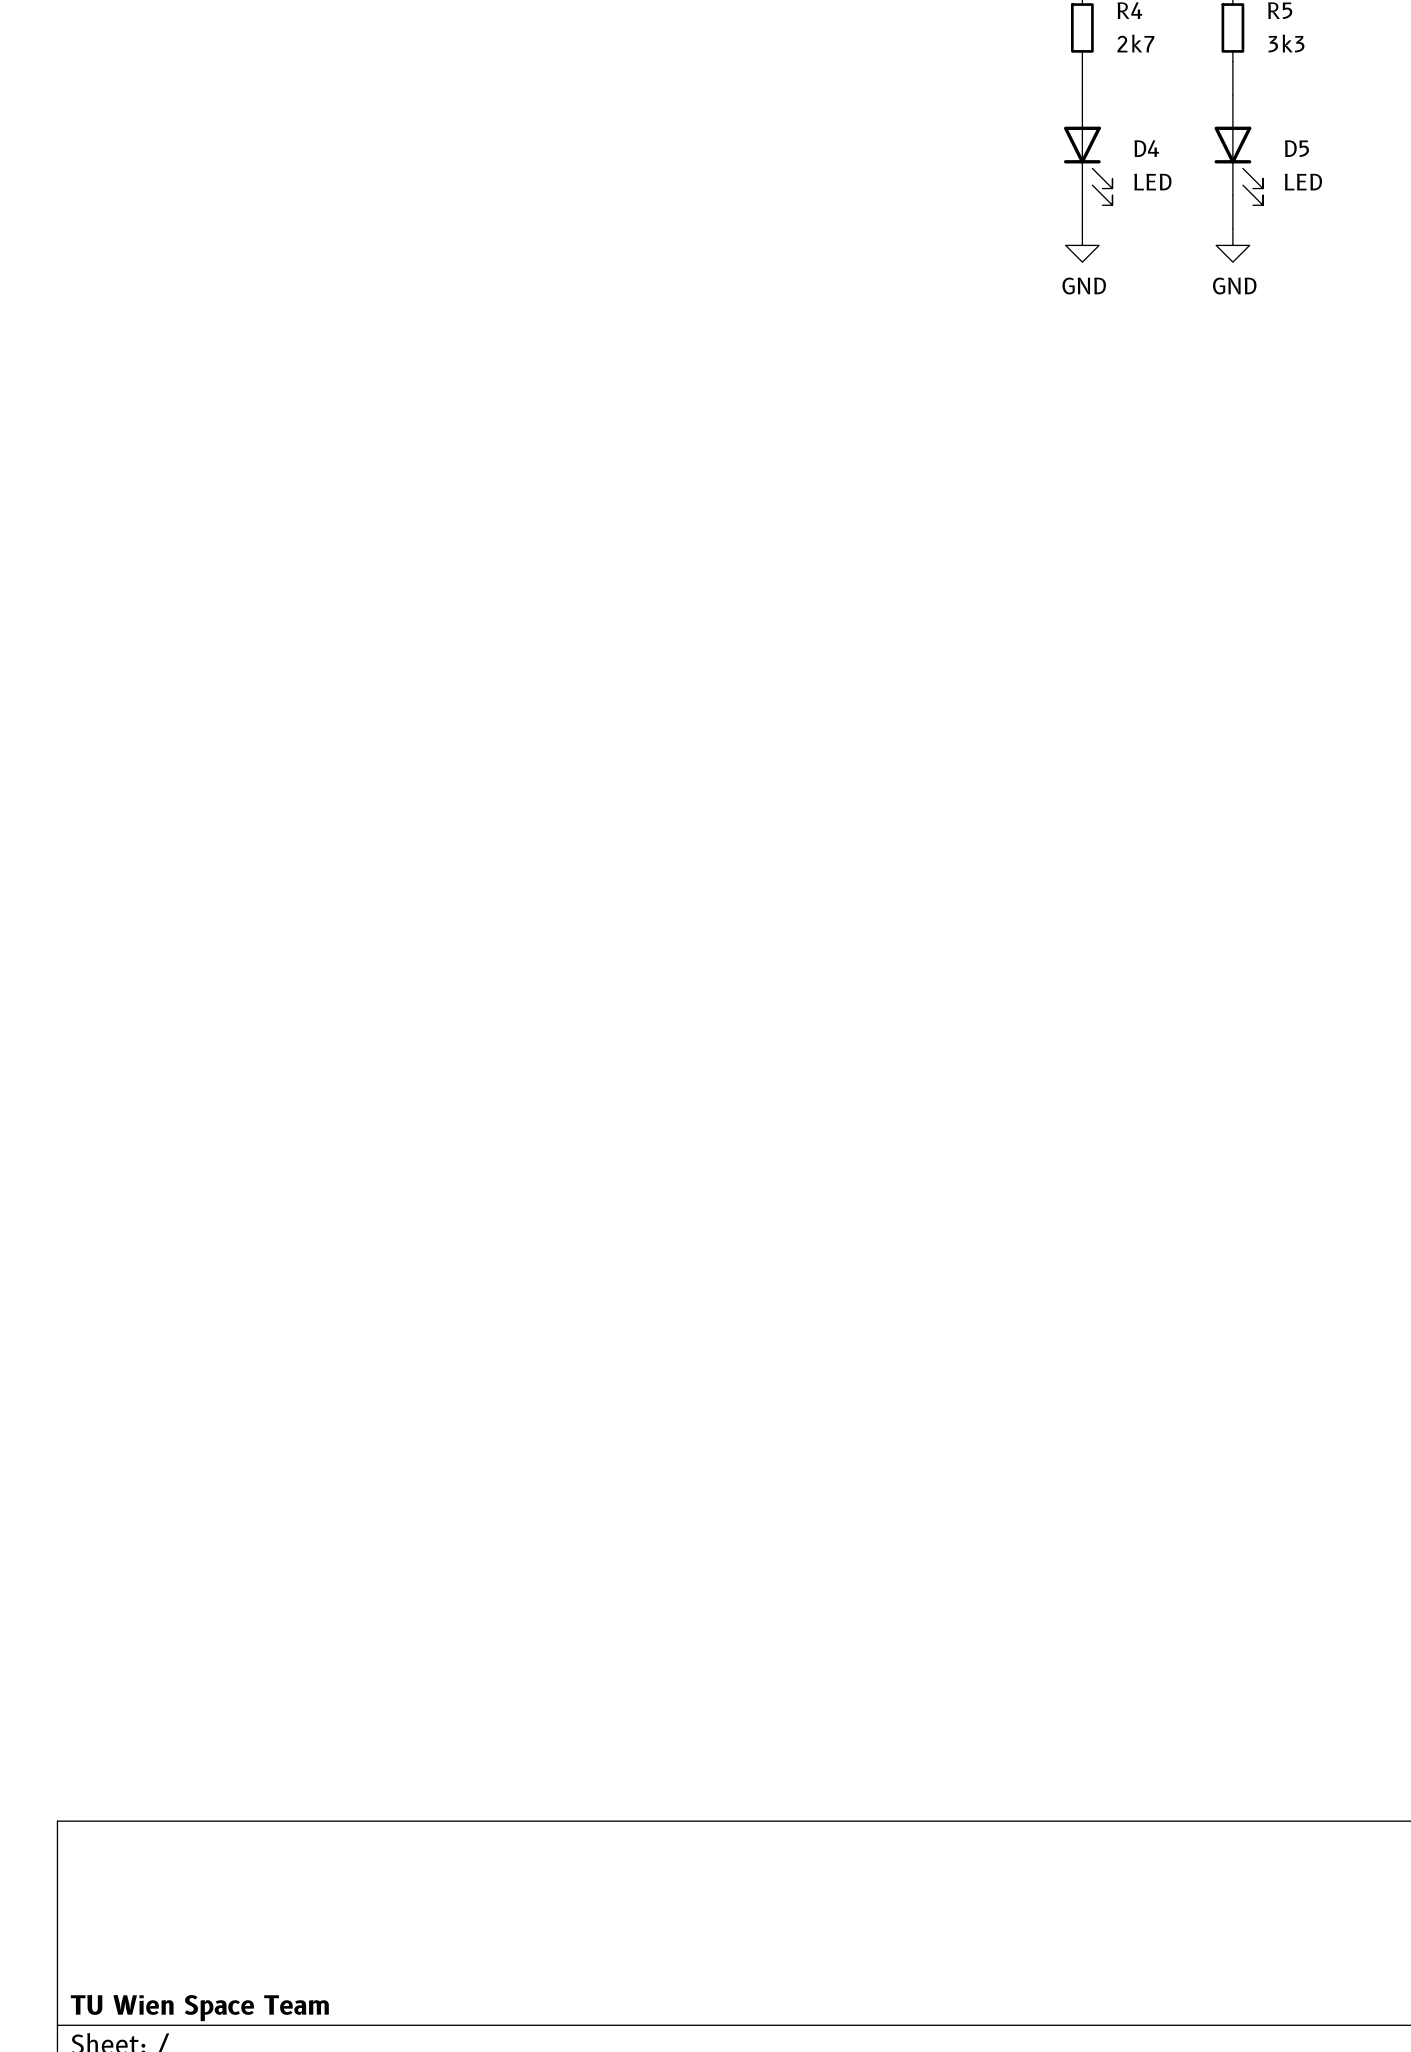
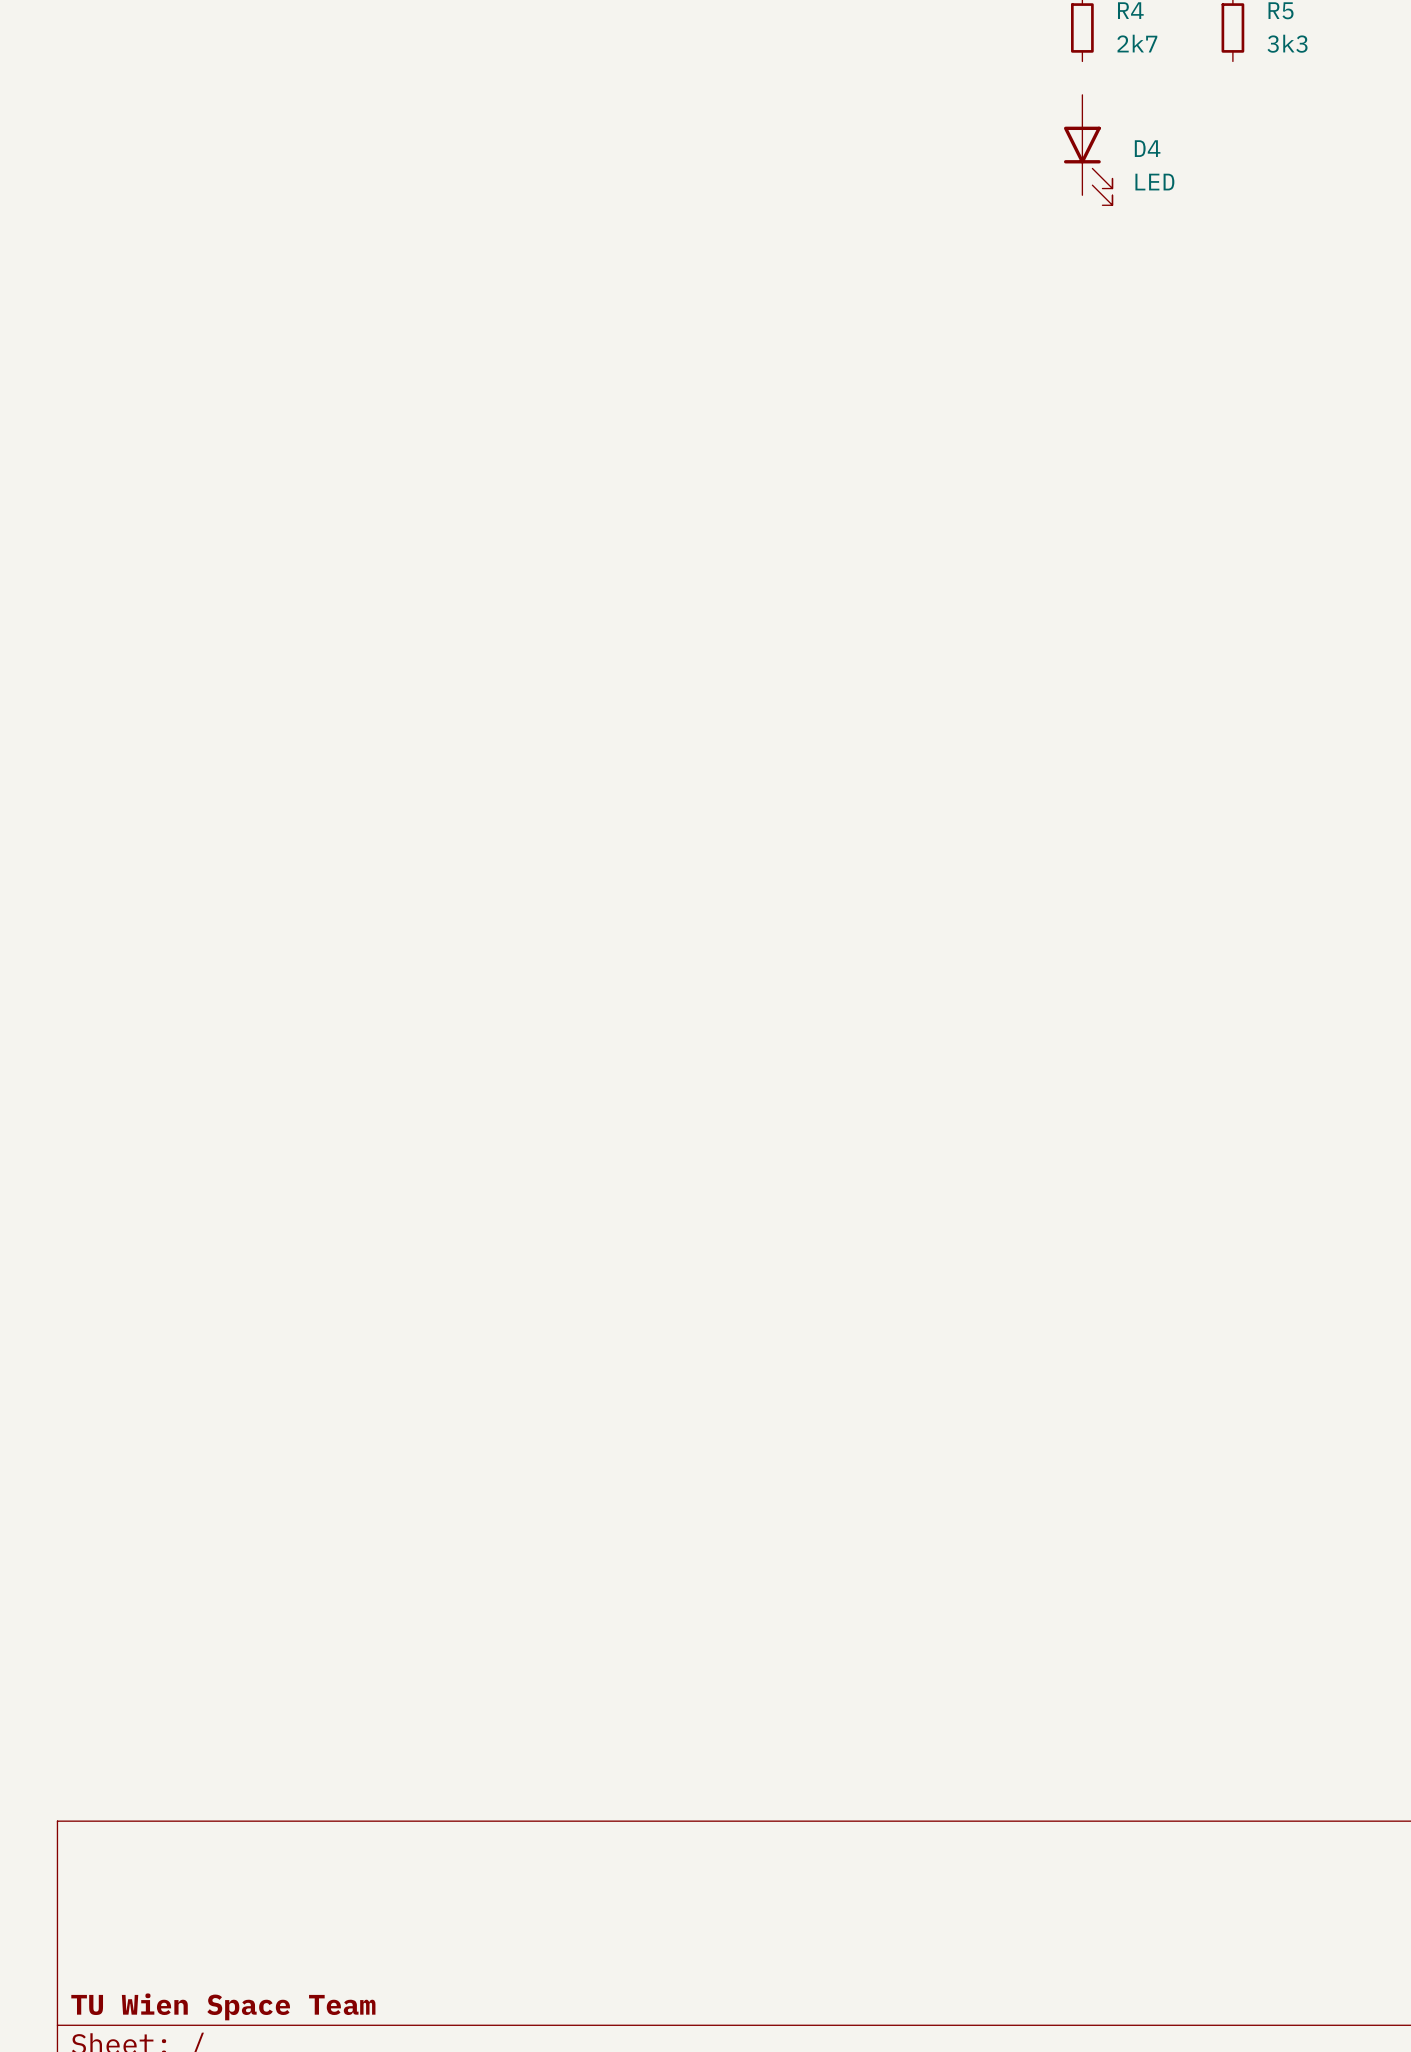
wire: (1082, 61) (1082, 94) -> none
wire: (1232, 61) (1232, 94) -> none
D5: LED (1238, 150) -> none
wire: (1082, 195) (1082, 228) -> none
wire: (1232, 195) (1232, 228) -> none
power symbol: GND (1082, 245) -> none
power symbol: GND (1232, 245) -> none

